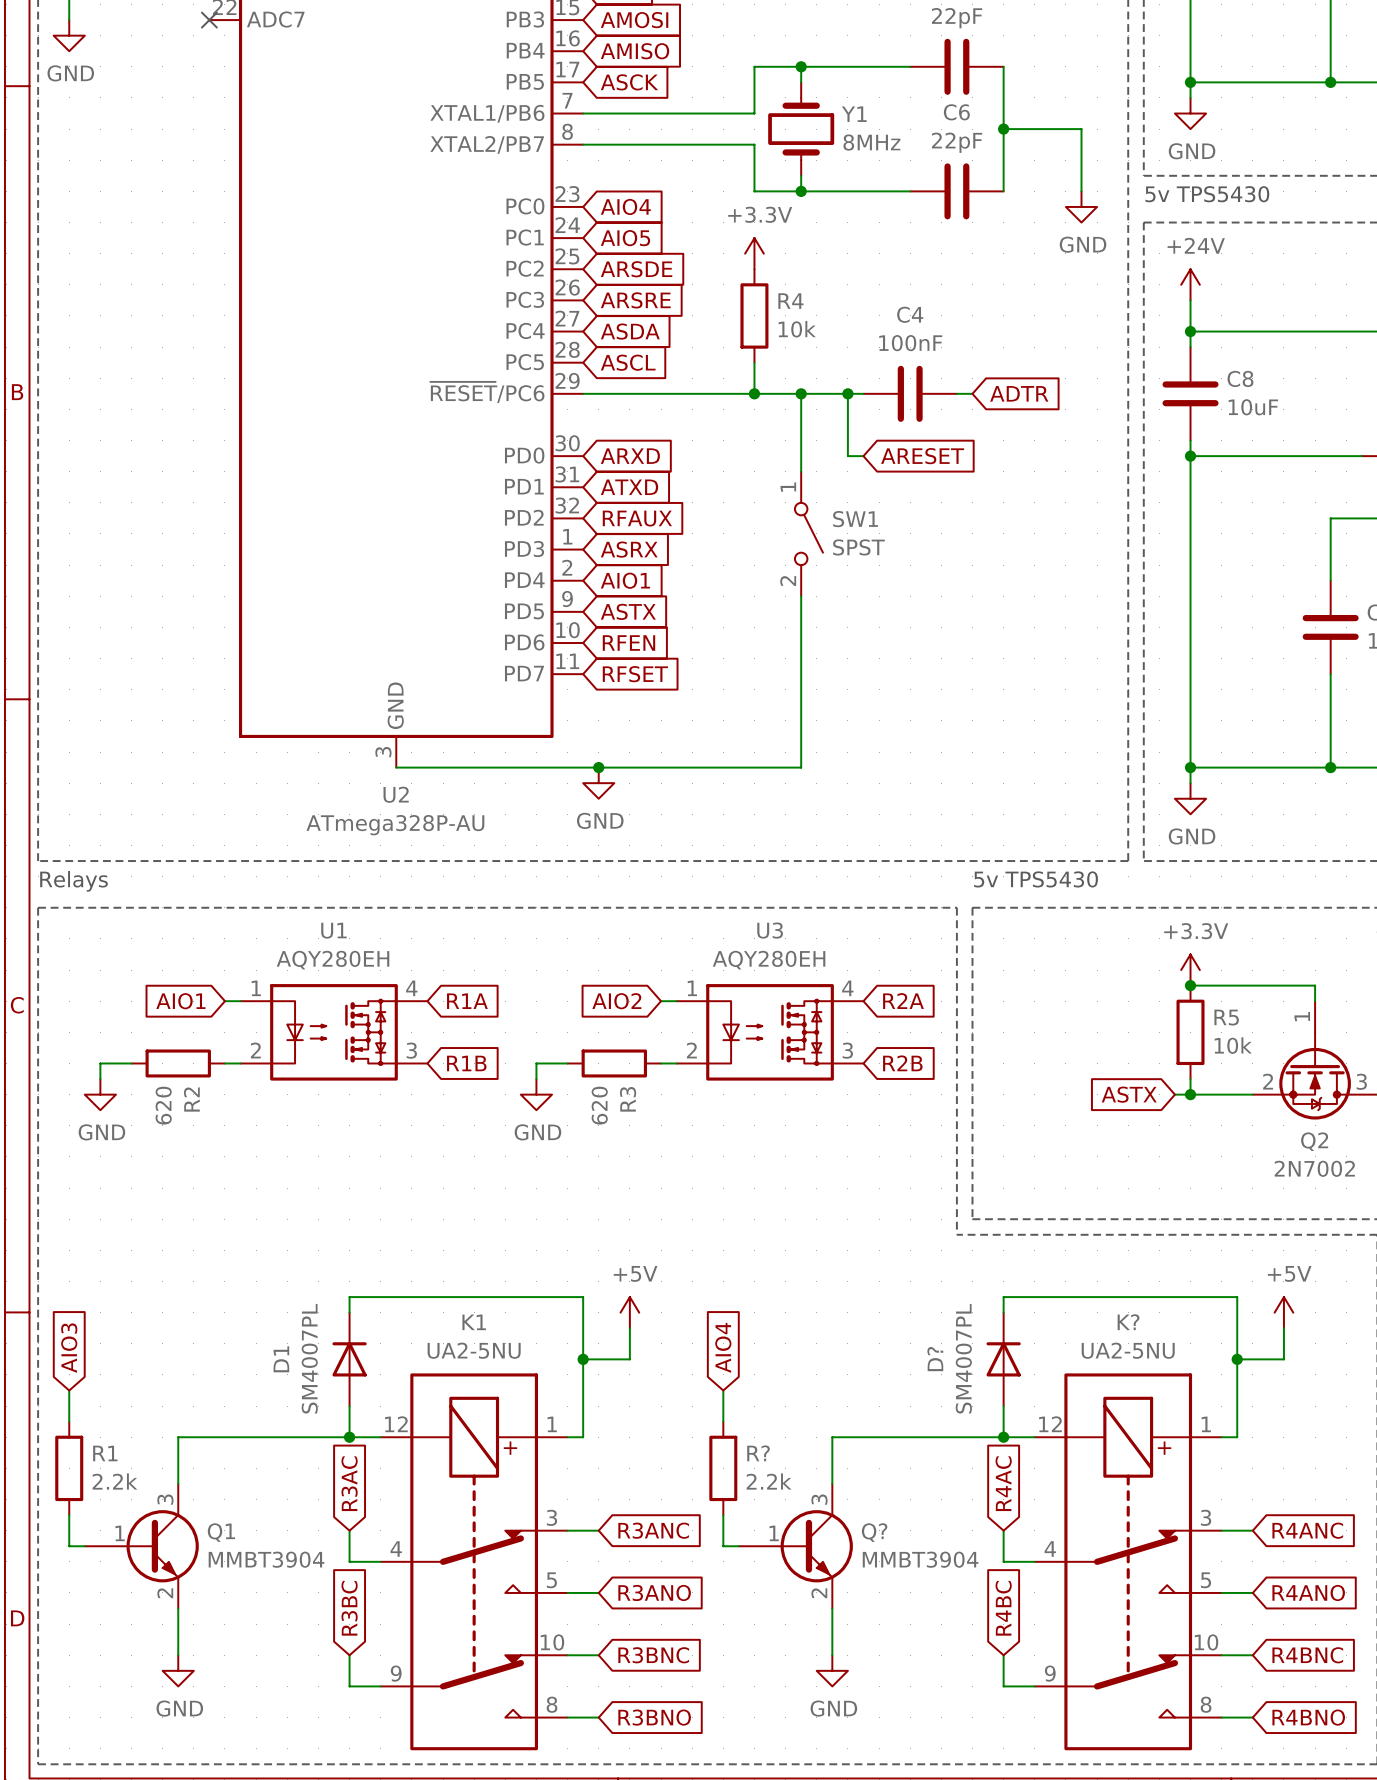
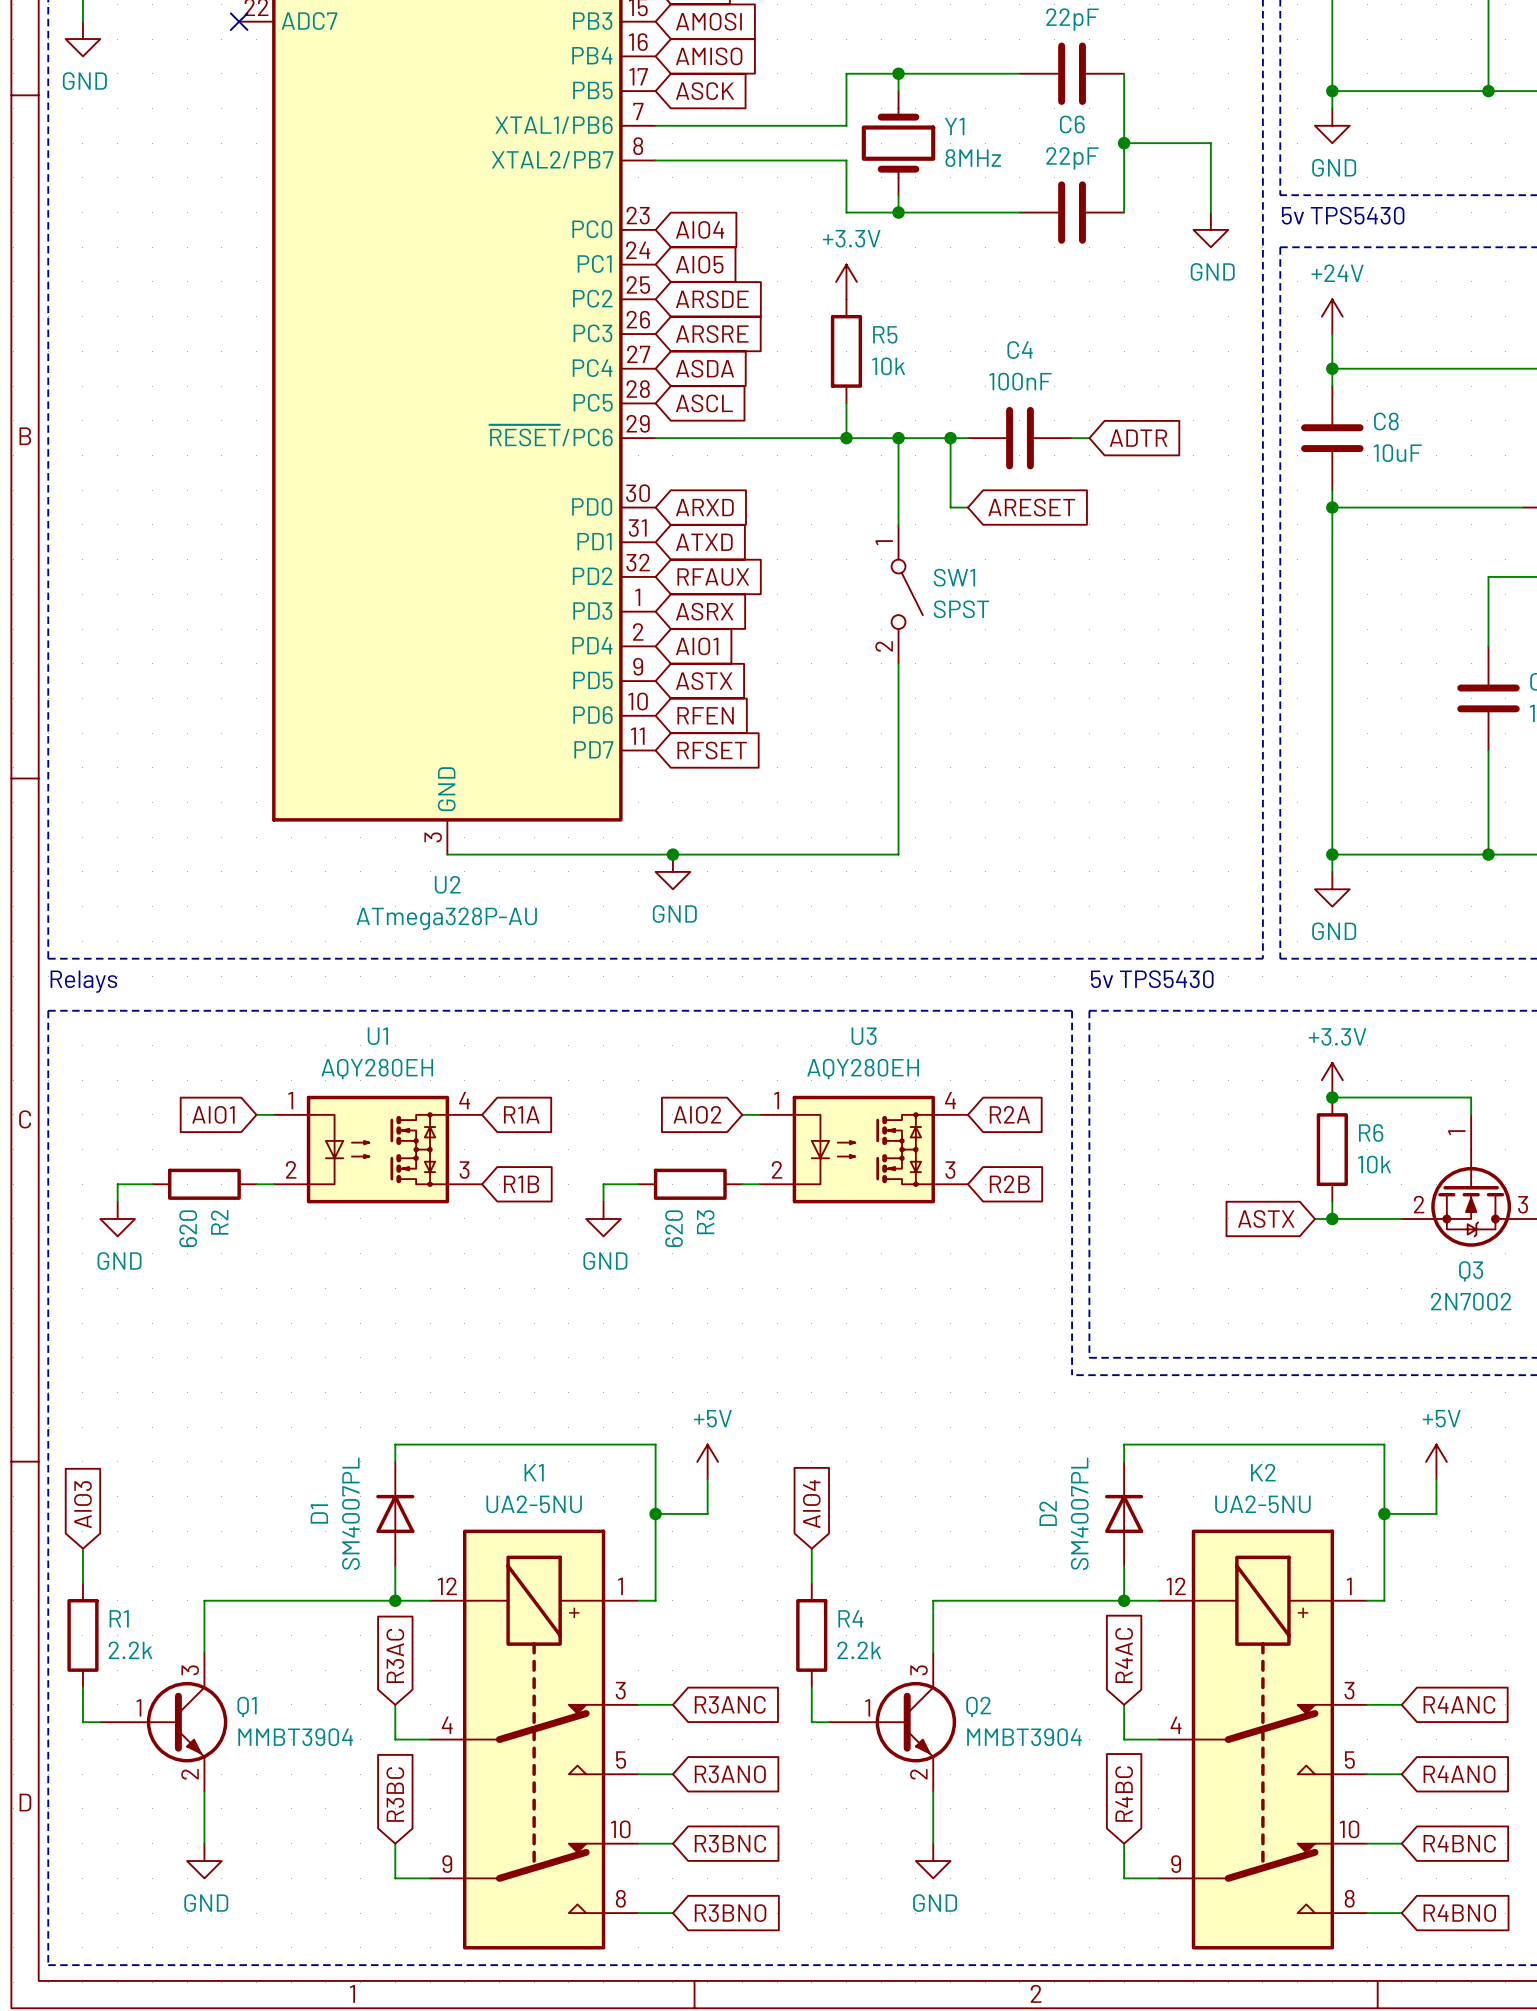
R4 name: R4 (790, 301) -> R5 (885, 334)
R5 name: R5 (1226, 1017) -> R6 (1371, 1132)
Q2 name: Q2 (1314, 1141) -> Q3 (1471, 1271)
K? name: K? (1128, 1322) -> K2 (1263, 1472)
D? name: D? (935, 1359) -> D2 (1048, 1513)
R? name: R? (758, 1453) -> R4 (850, 1618)
Q? name: Q? (874, 1532) -> Q2 (978, 1706)

